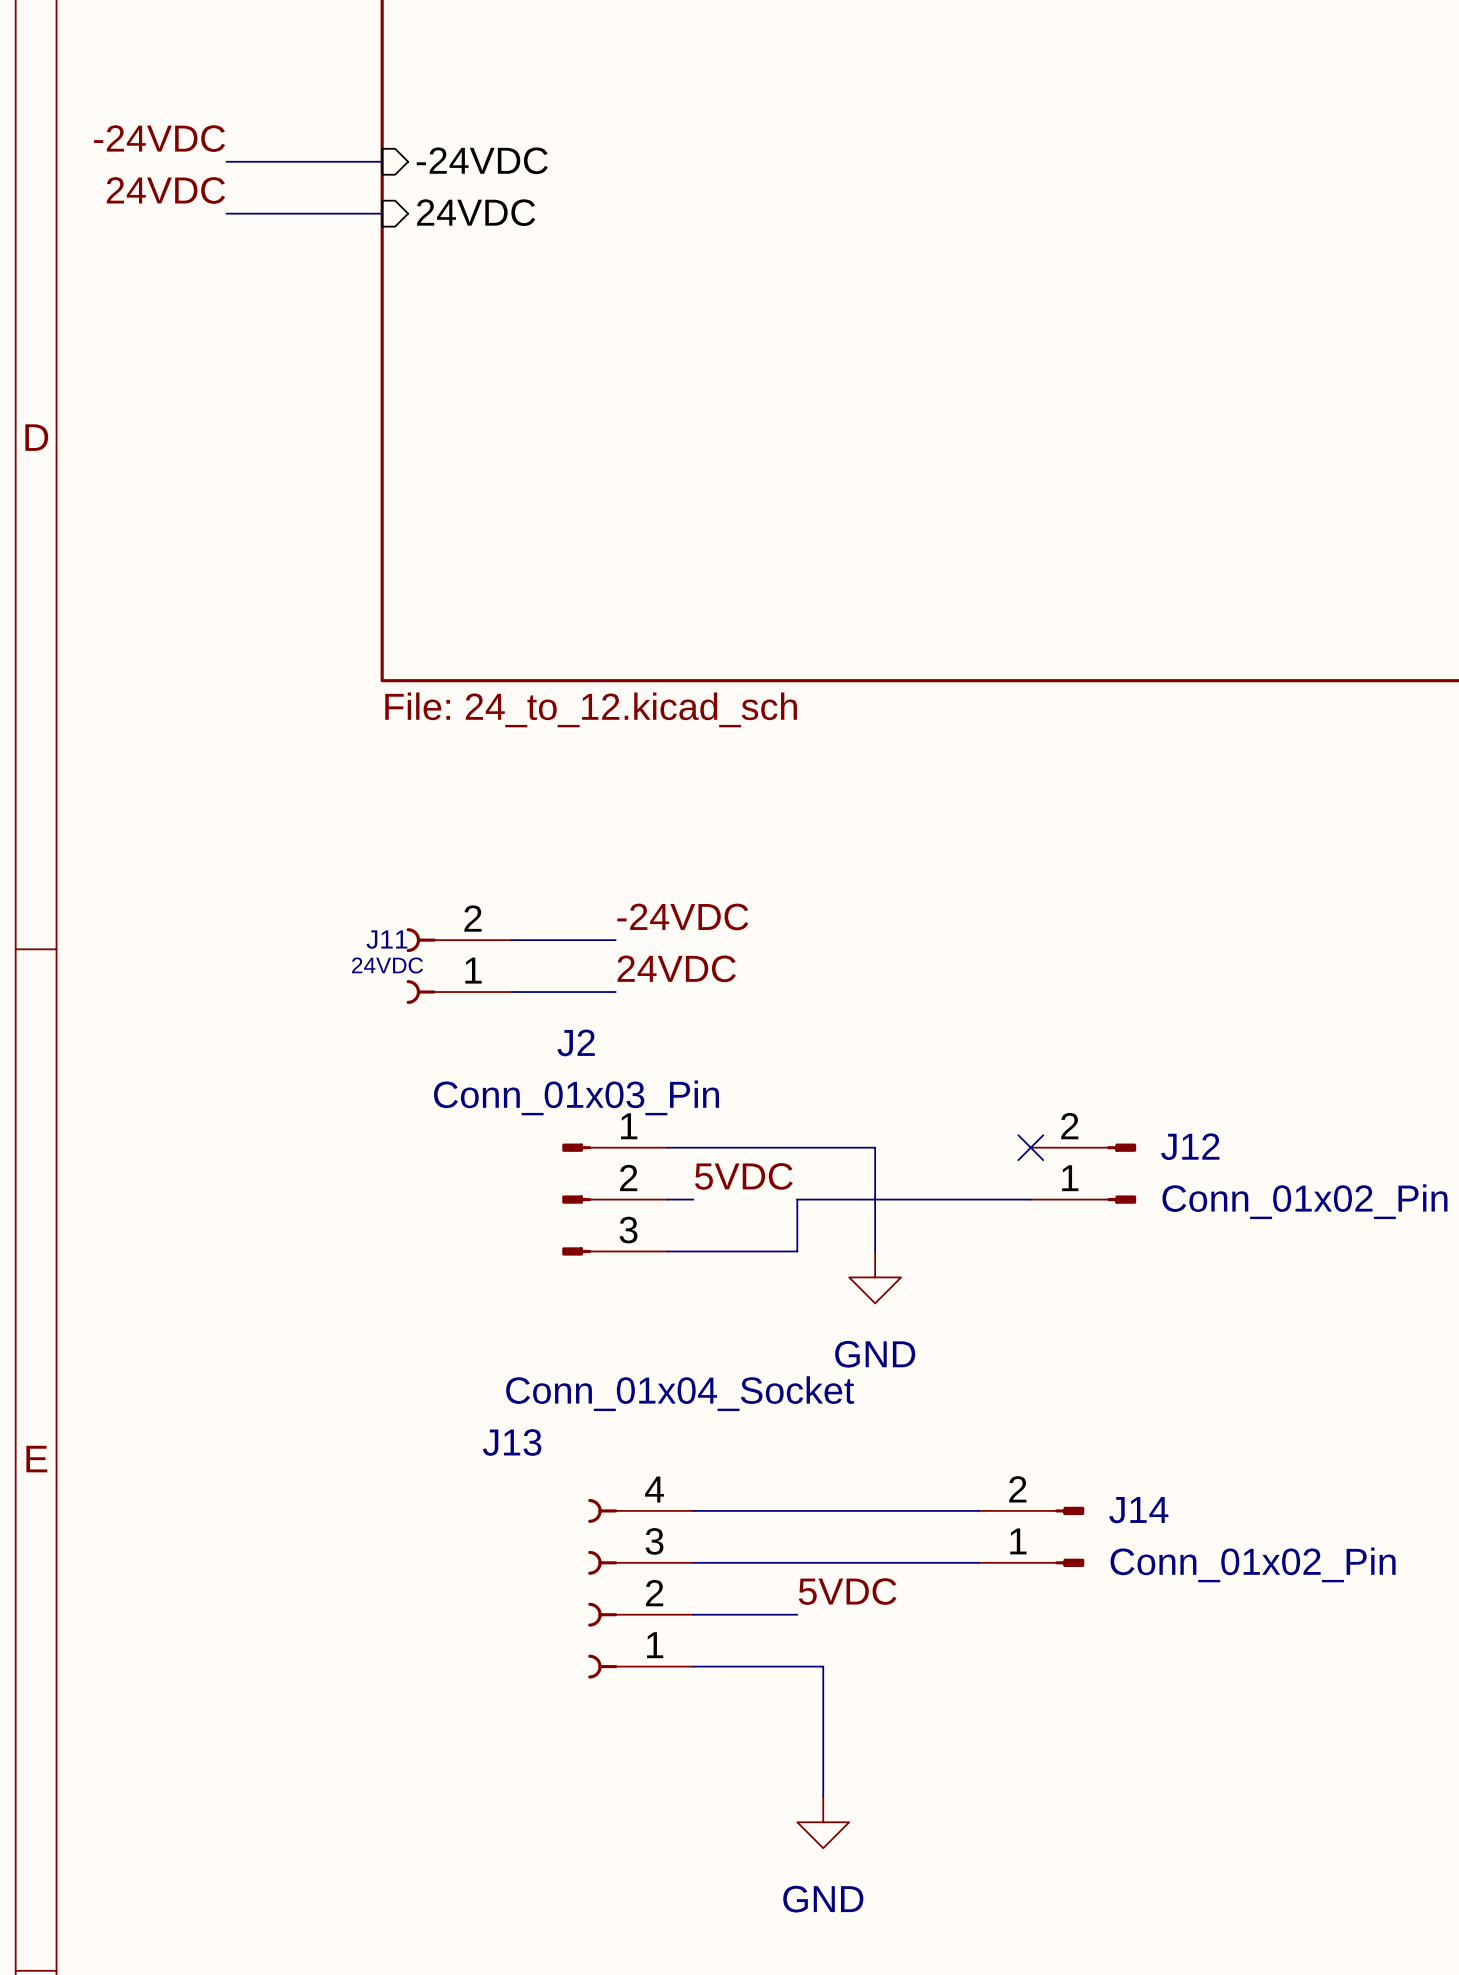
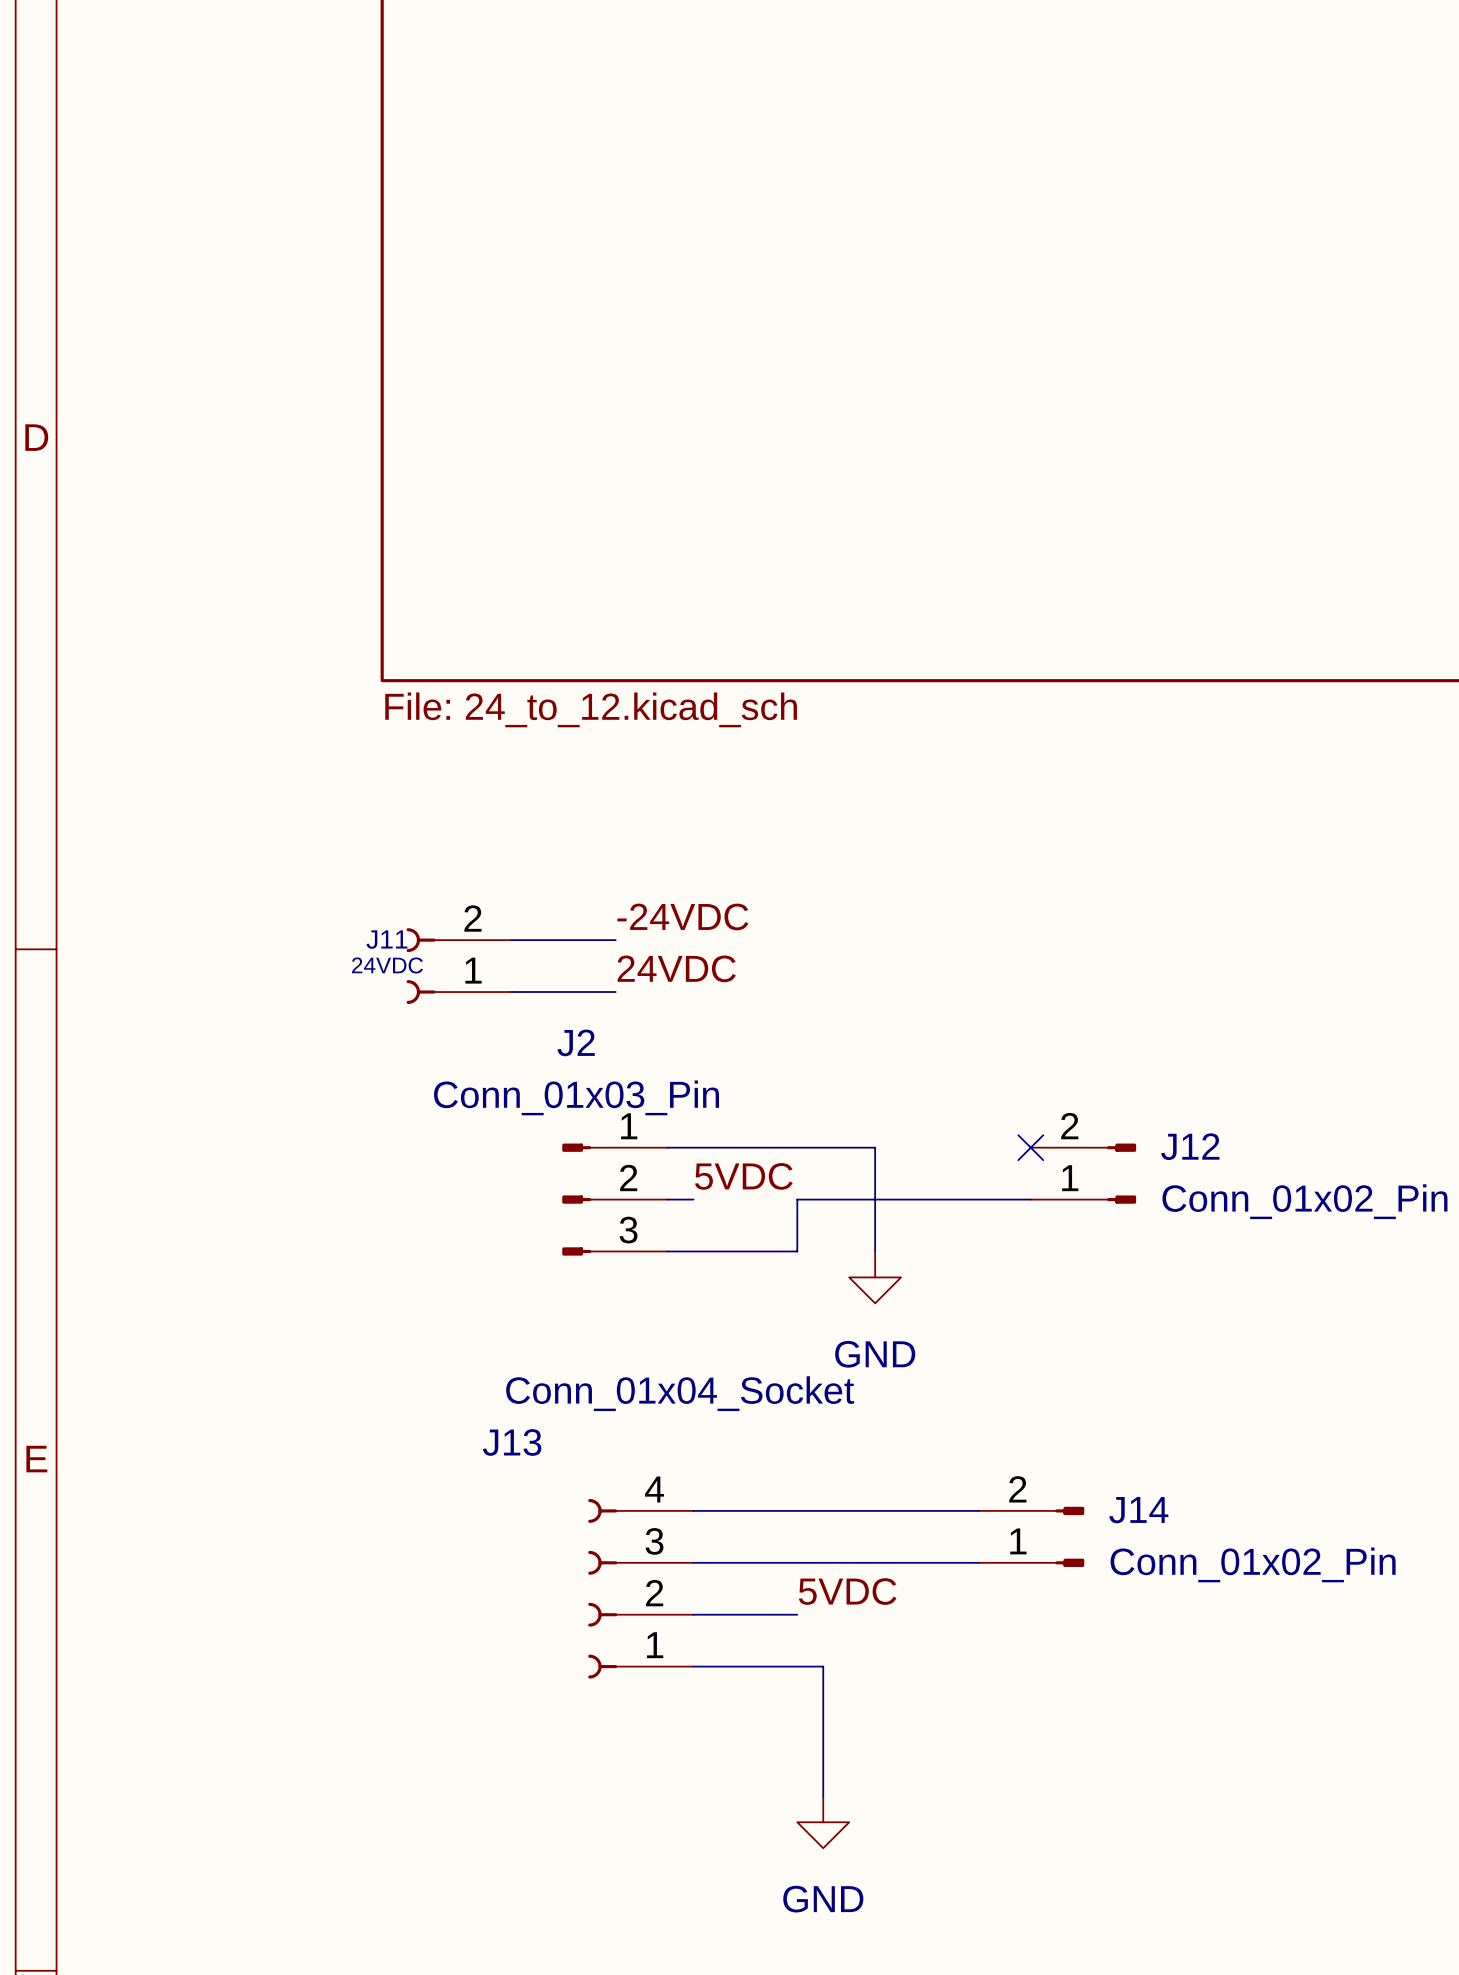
label: -24VDC (159, 138) -> none
sheet pin: -24VDC (482, 160) -> none
wire: (226, 161) (382, 161) -> none
label: 24VDC (165, 190) -> none
sheet pin: 24VDC (476, 212) -> none
wire: (226, 213) (382, 213) -> none

